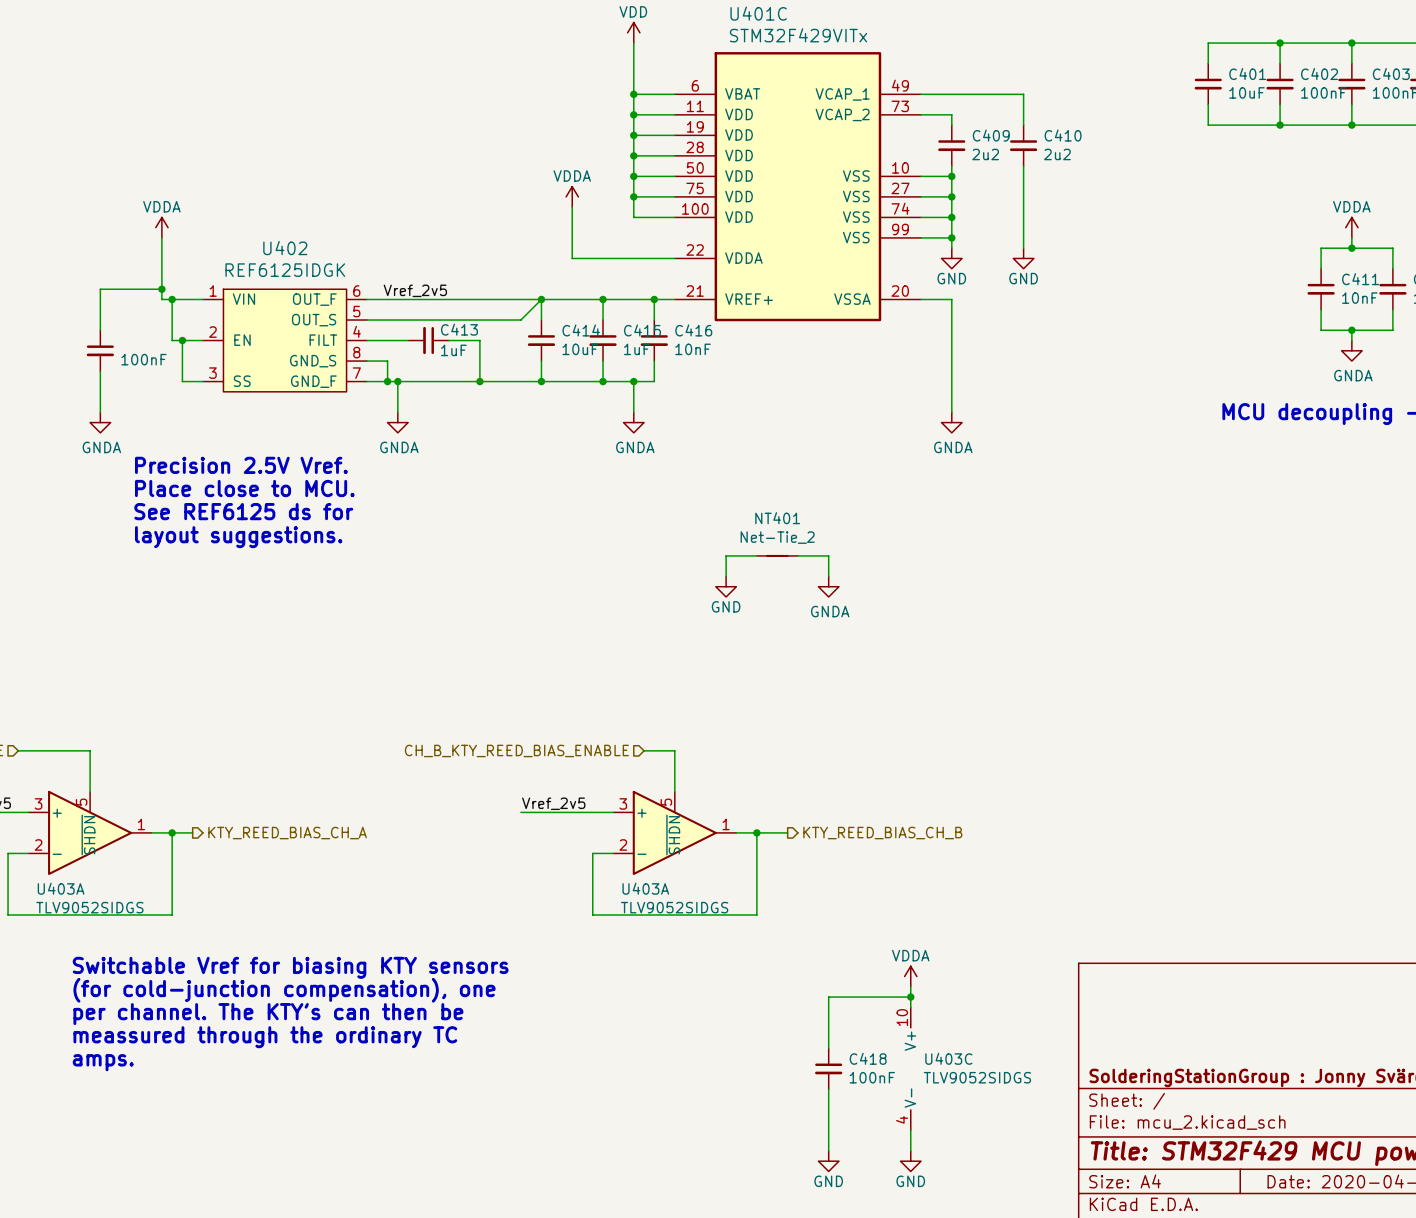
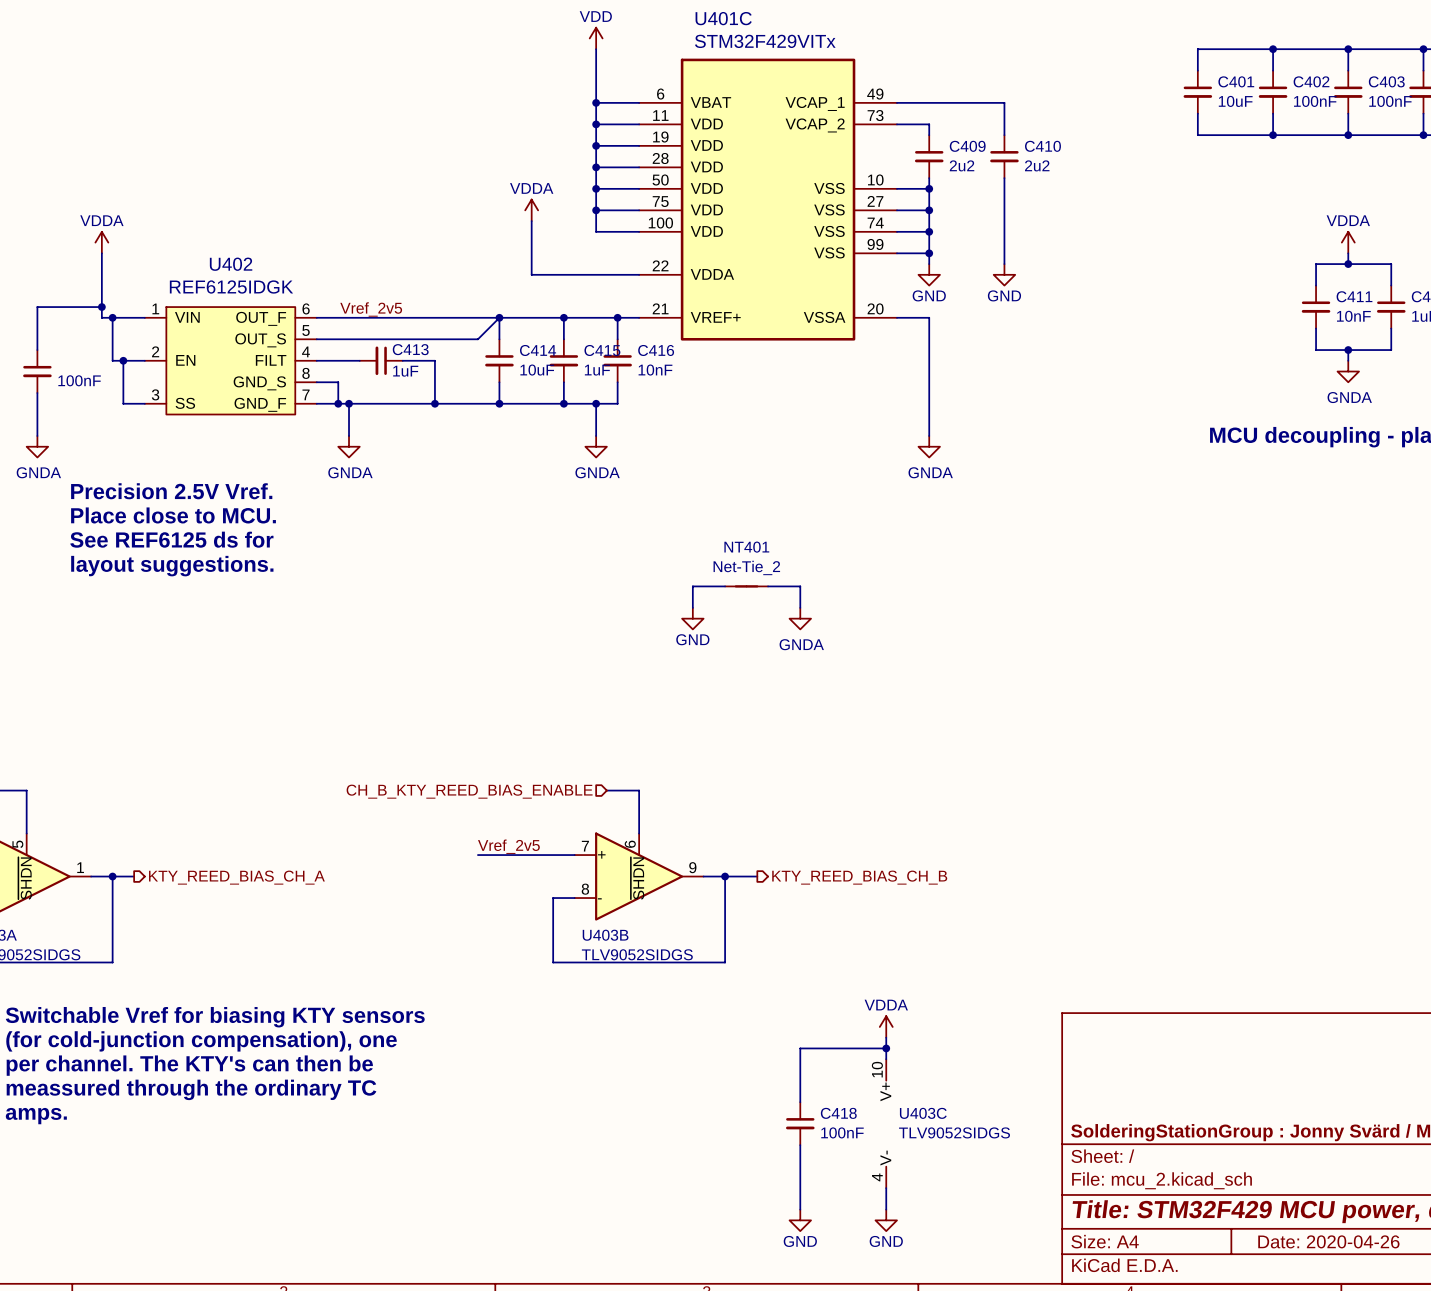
U403A pin number: 5 (666, 802) -> 6 (630, 844)
U403A pin number: 3 (623, 803) -> 7 (585, 846)
U403A pin number: 1 (726, 824) -> 9 (692, 867)
U403A pin number: 2 (623, 844) -> 8 (585, 889)
U403A name: U403A (645, 888) -> U403B (605, 935)

